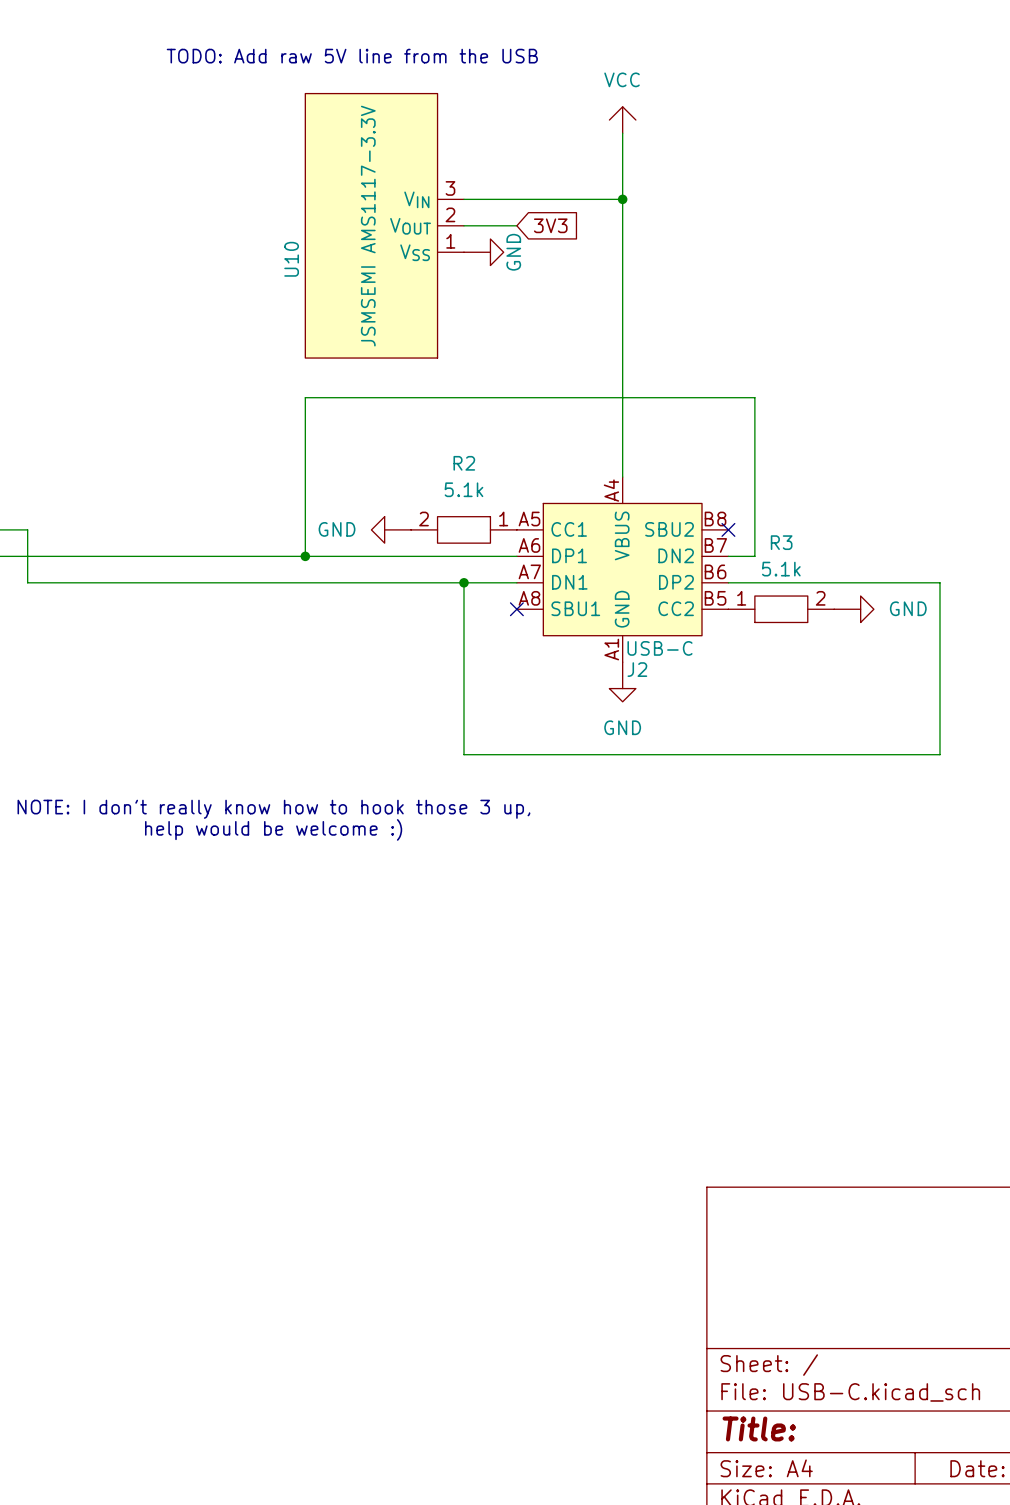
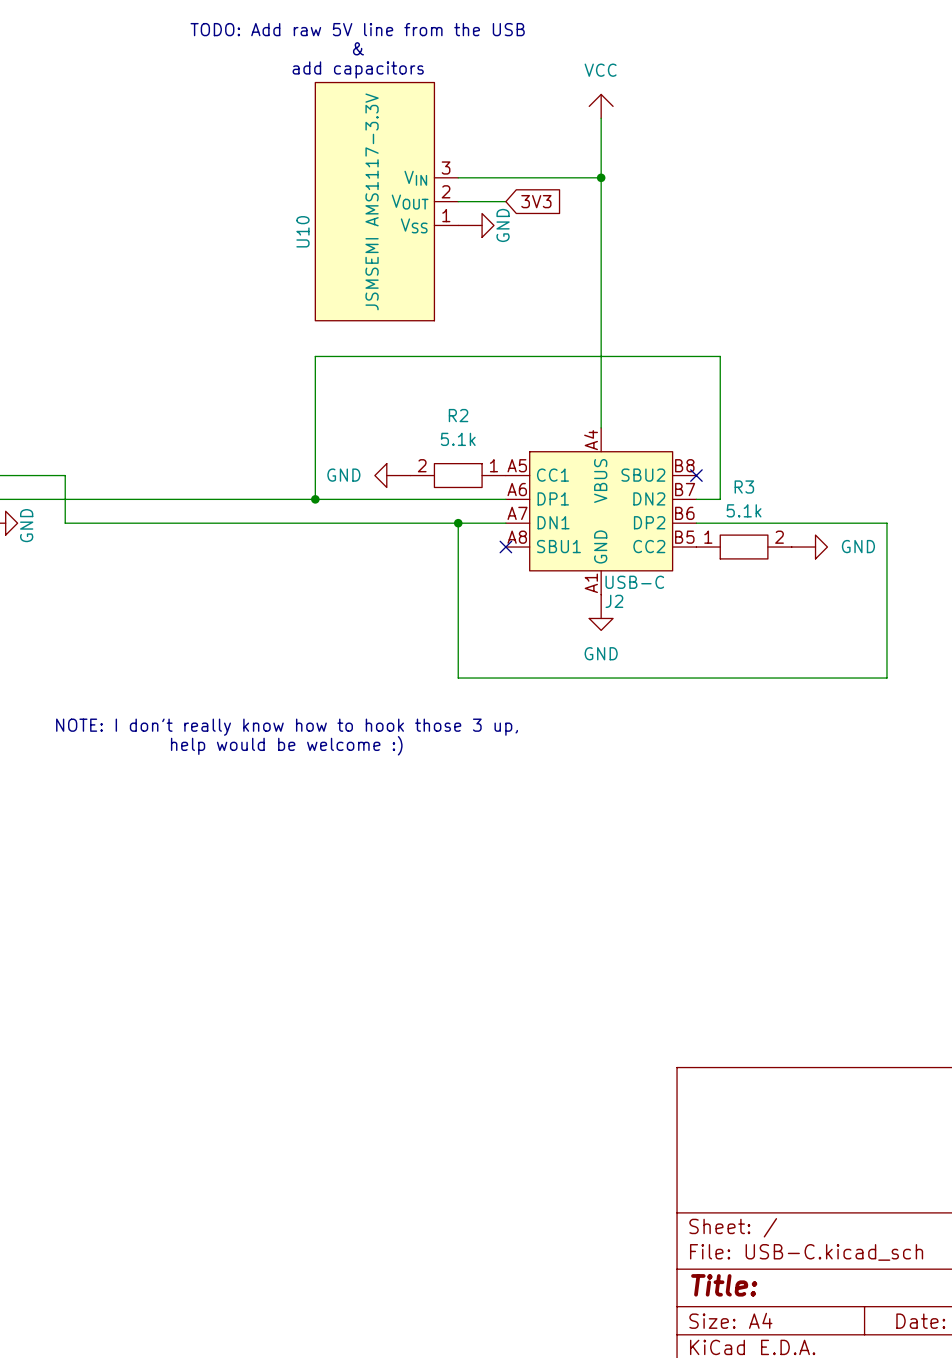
text: none -> TODO: Add raw 5V line from the USB (357, 29)
text: TODO: Add raw 5V line from the USB (352, 56) -> & (358, 48)
text: none -> add capacitors (358, 69)

